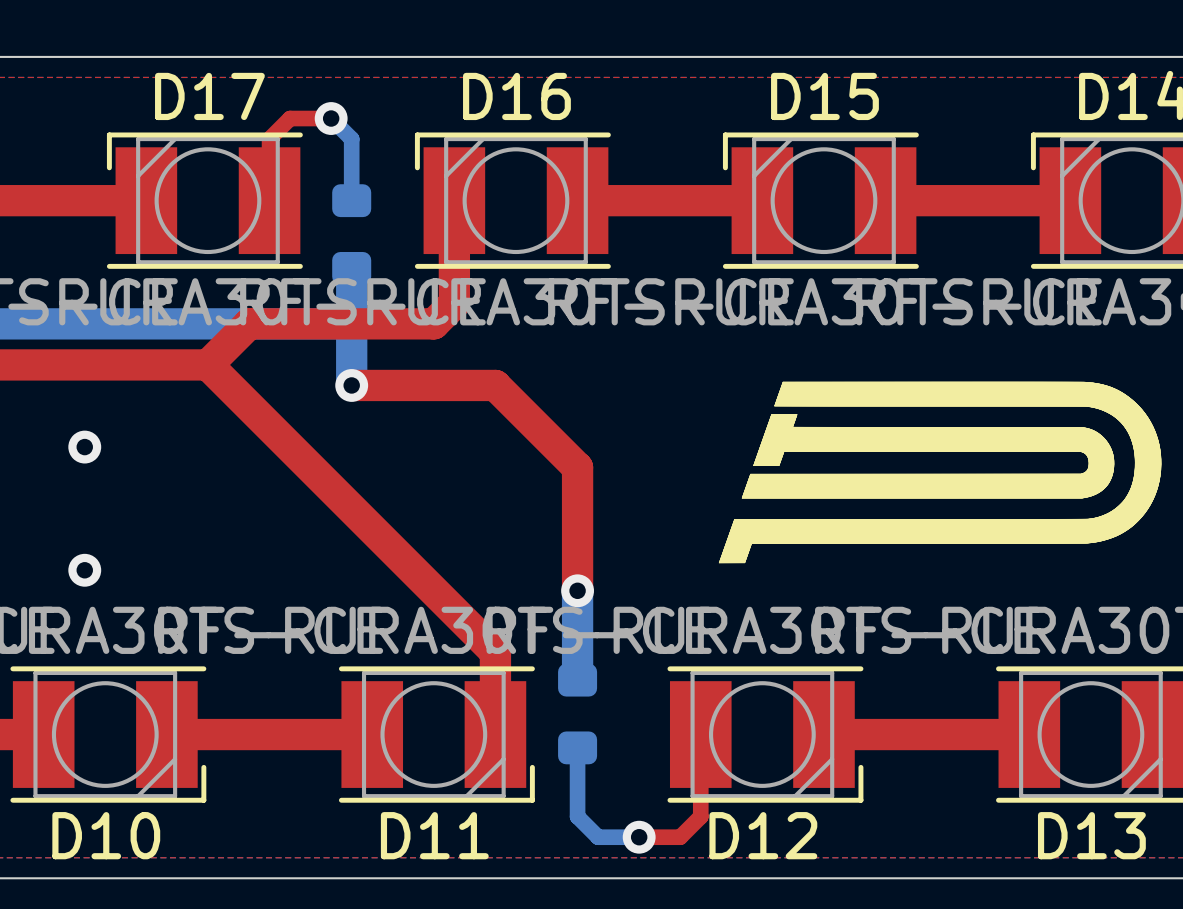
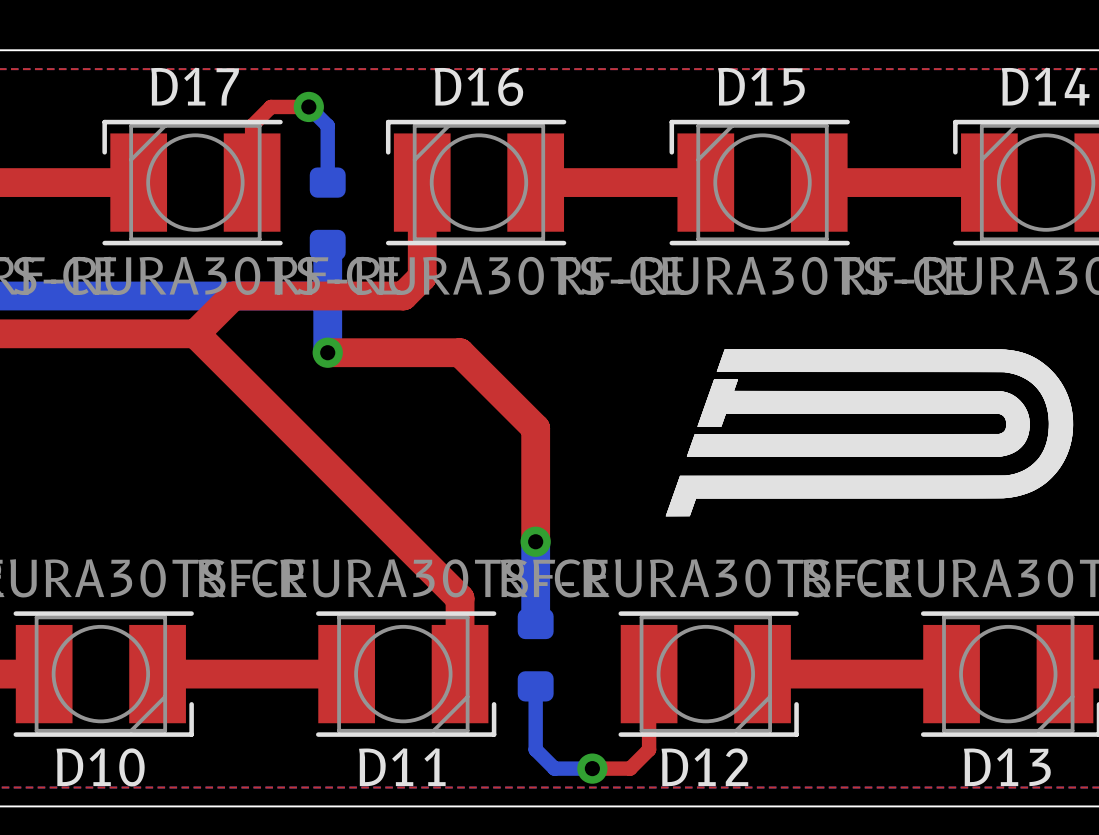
via: (84, 447) -> none
via: (84, 570) -> none

